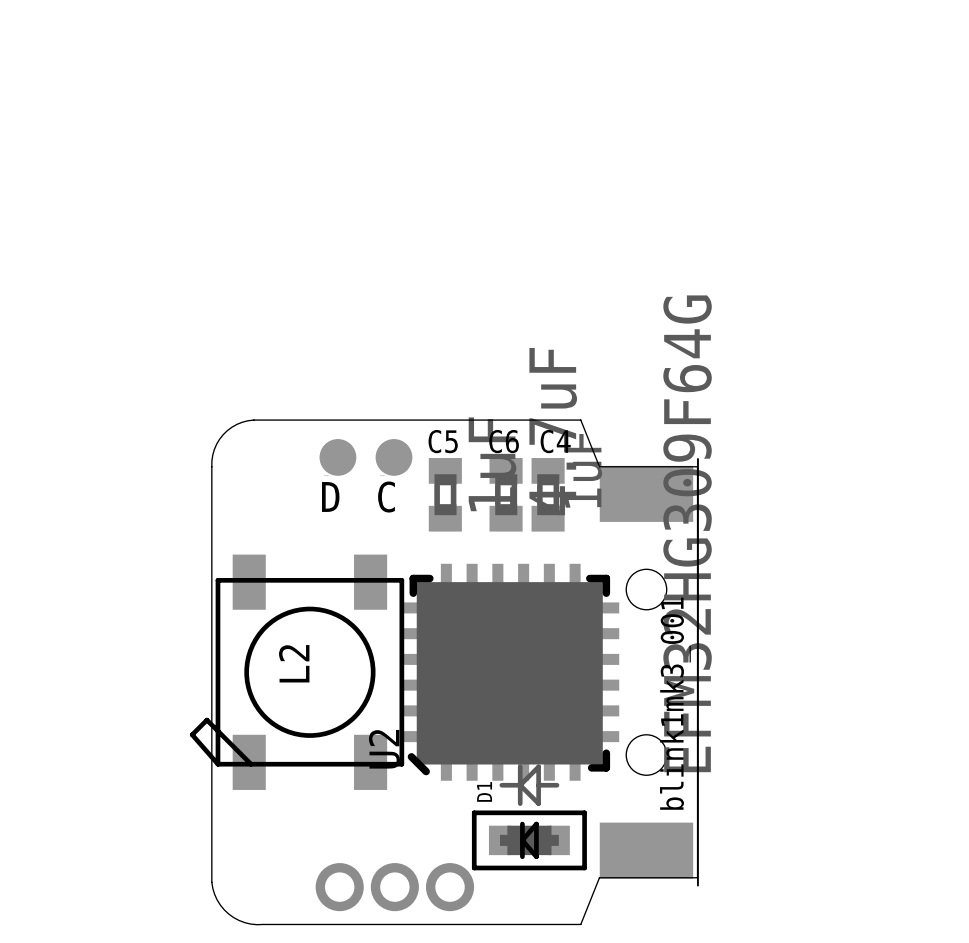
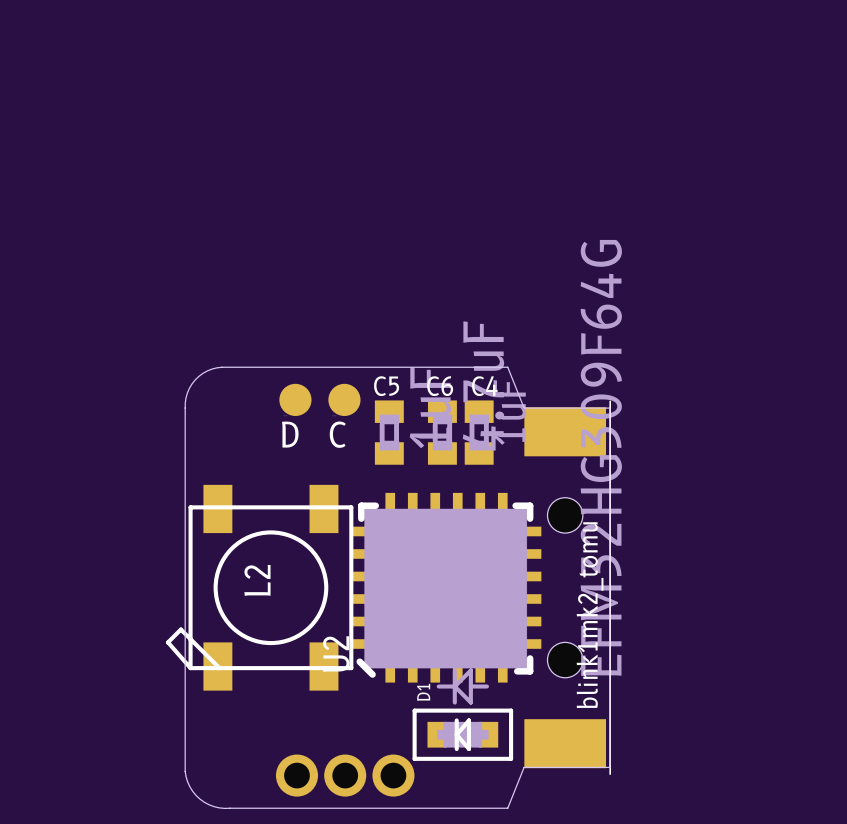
text: blink1mk3_001 (675, 703) -> blink1mk2_tomu (590, 615)

